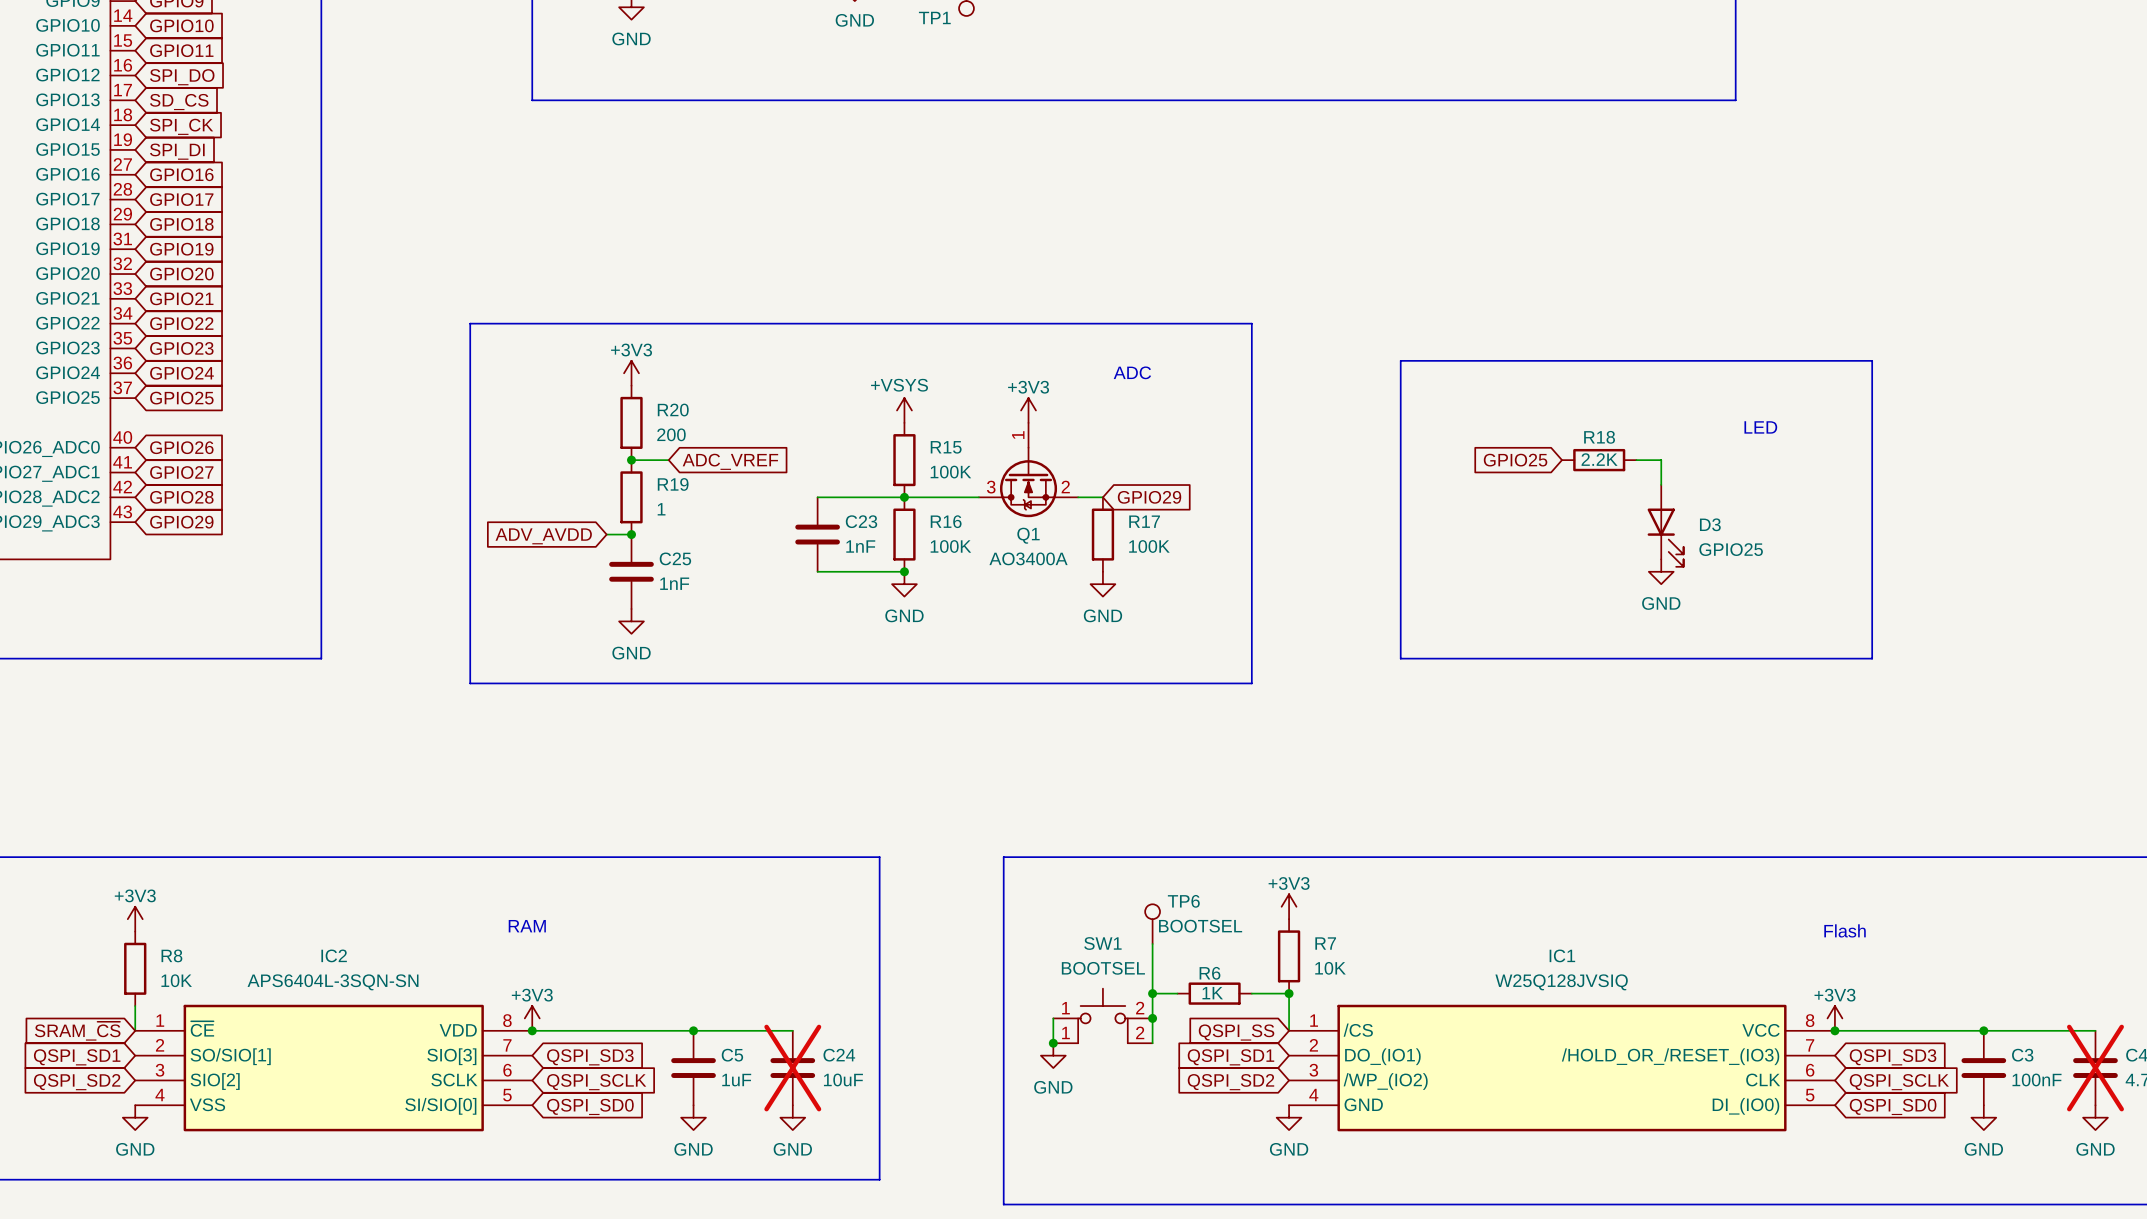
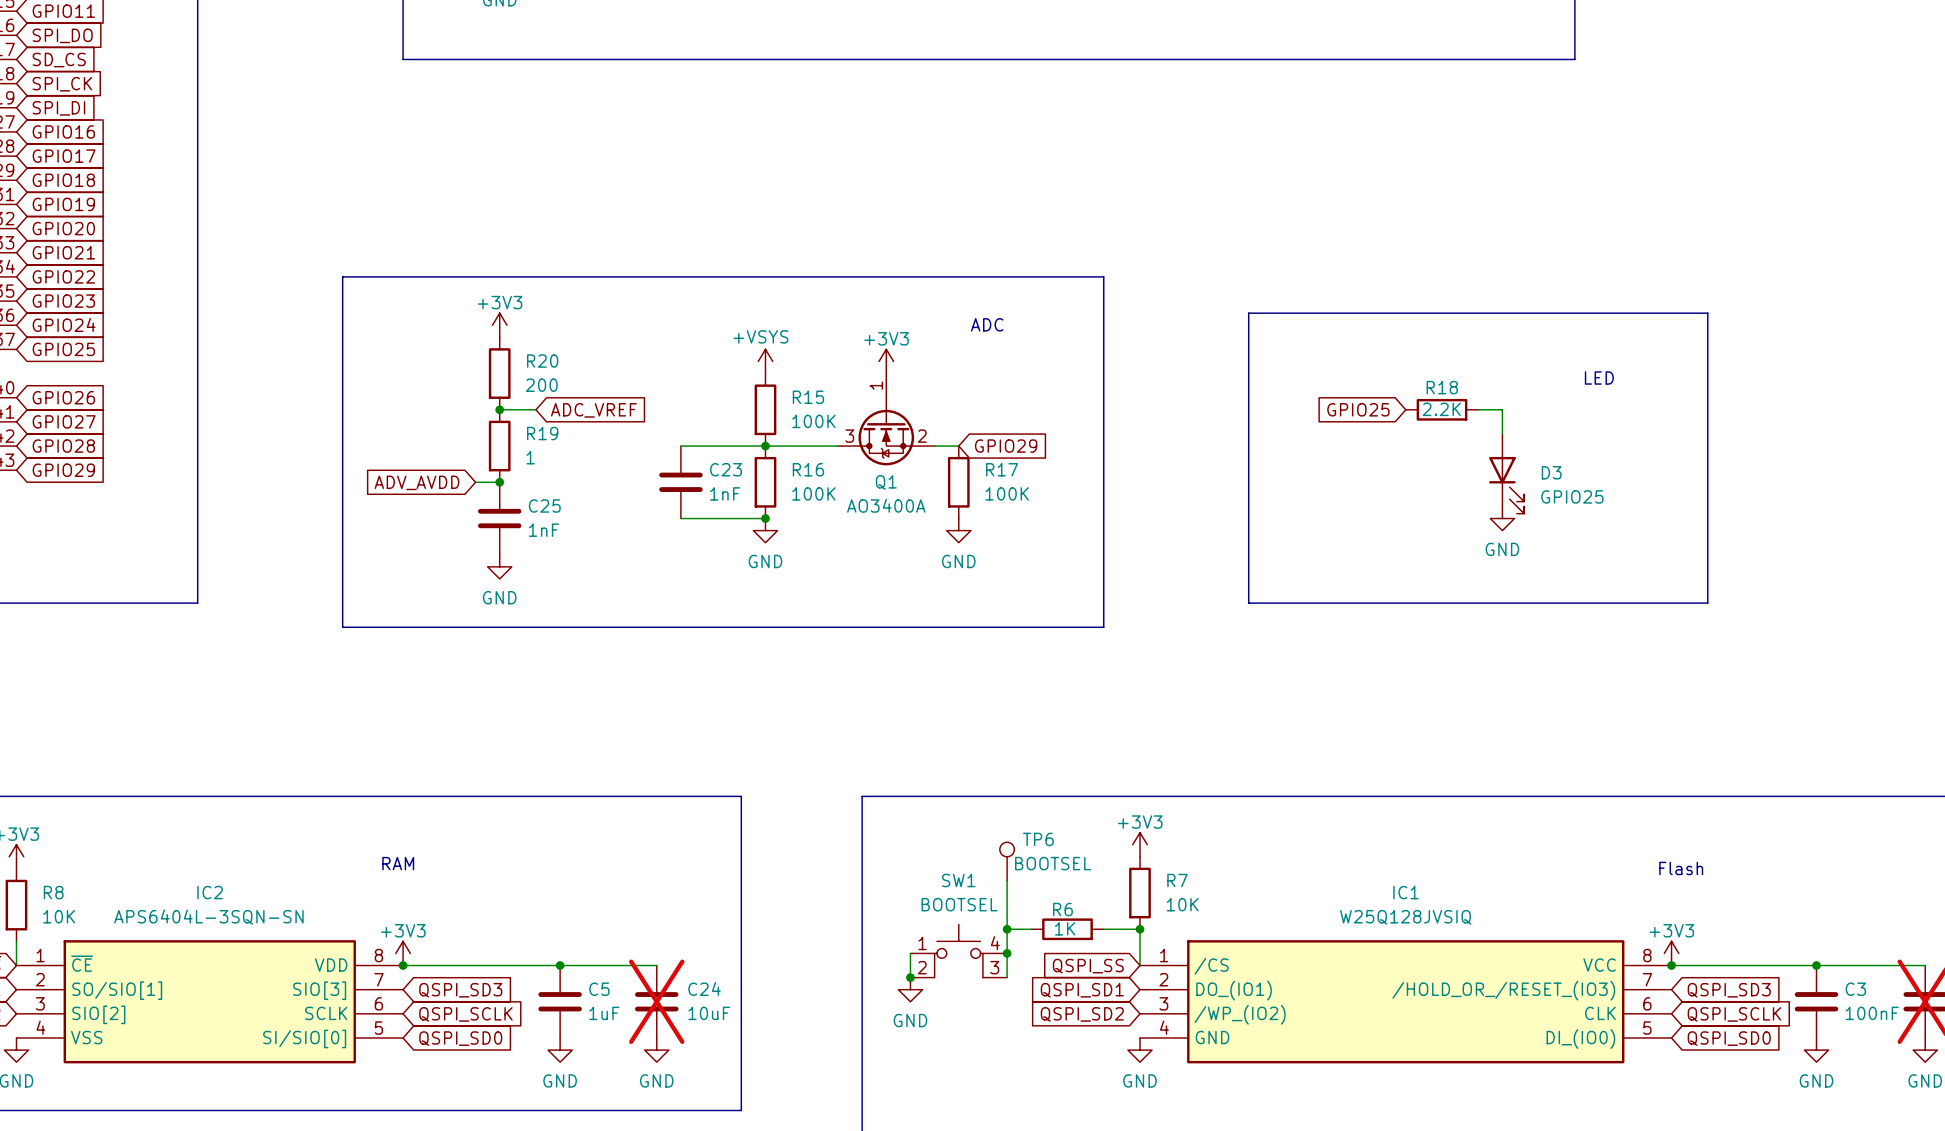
SW1 pin number: 2 (1140, 1008) -> 4 (995, 943)
SW1 pin number: 2 (1140, 1032) -> 3 (994, 967)
SW1 pin number: 1 (1065, 1033) -> 2 (922, 967)

